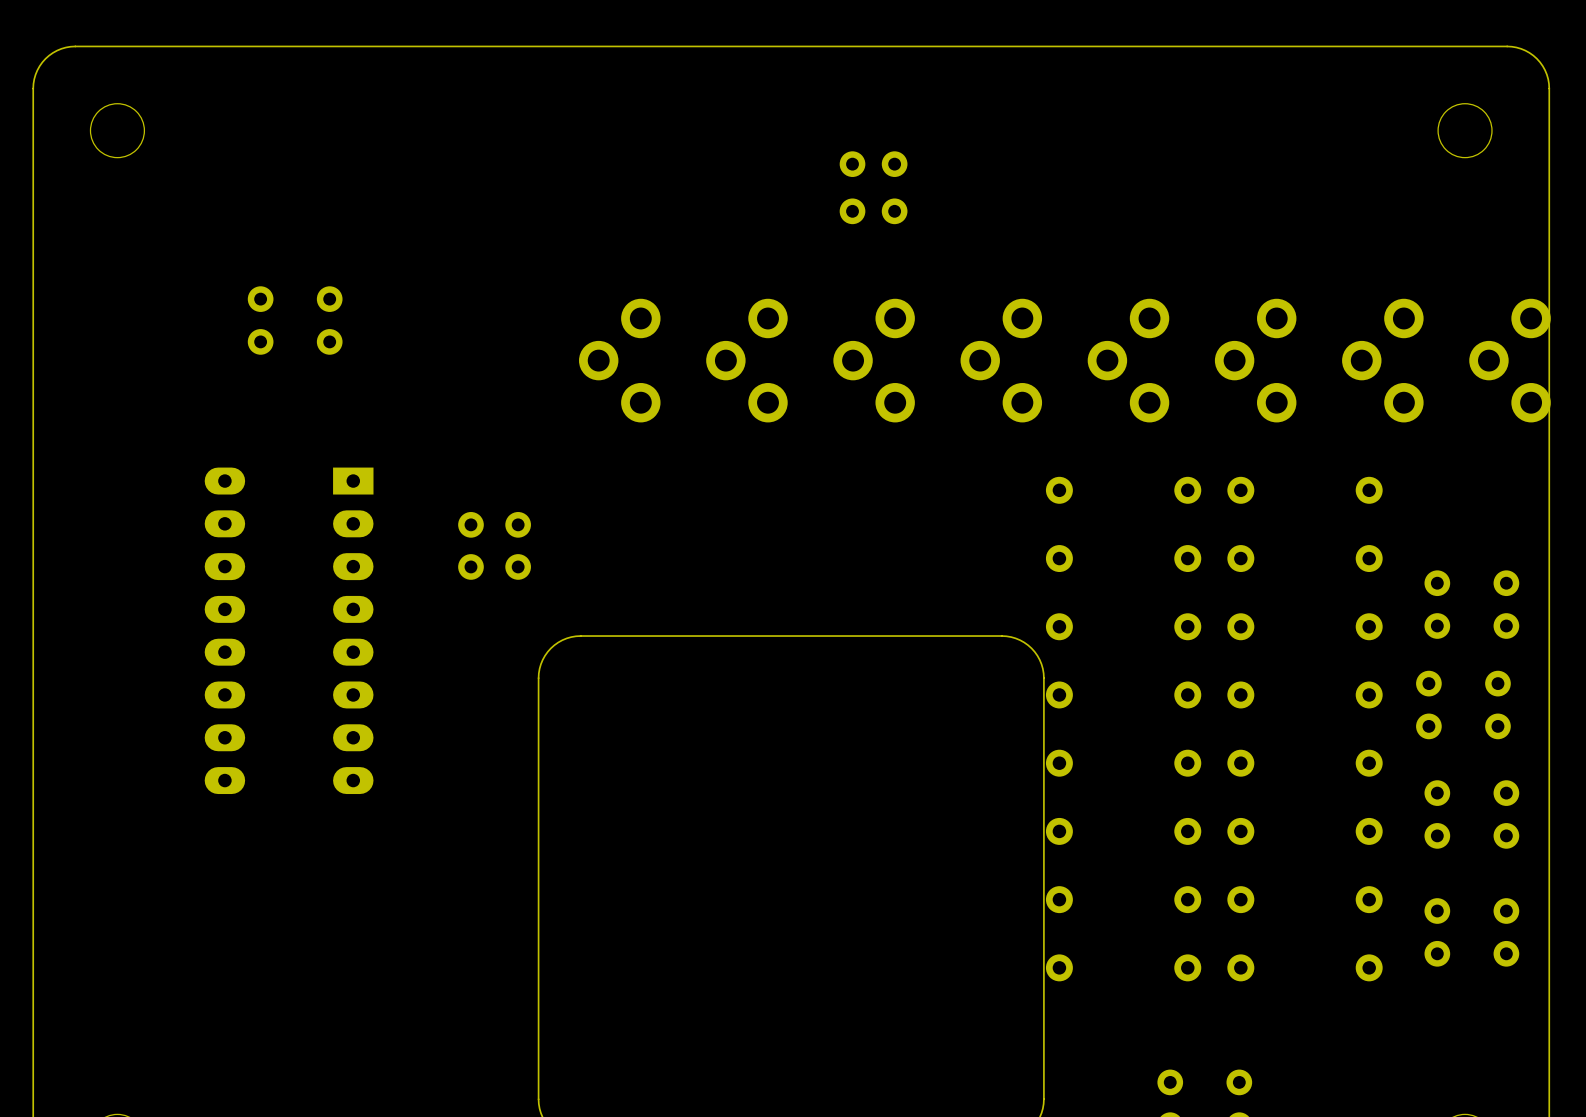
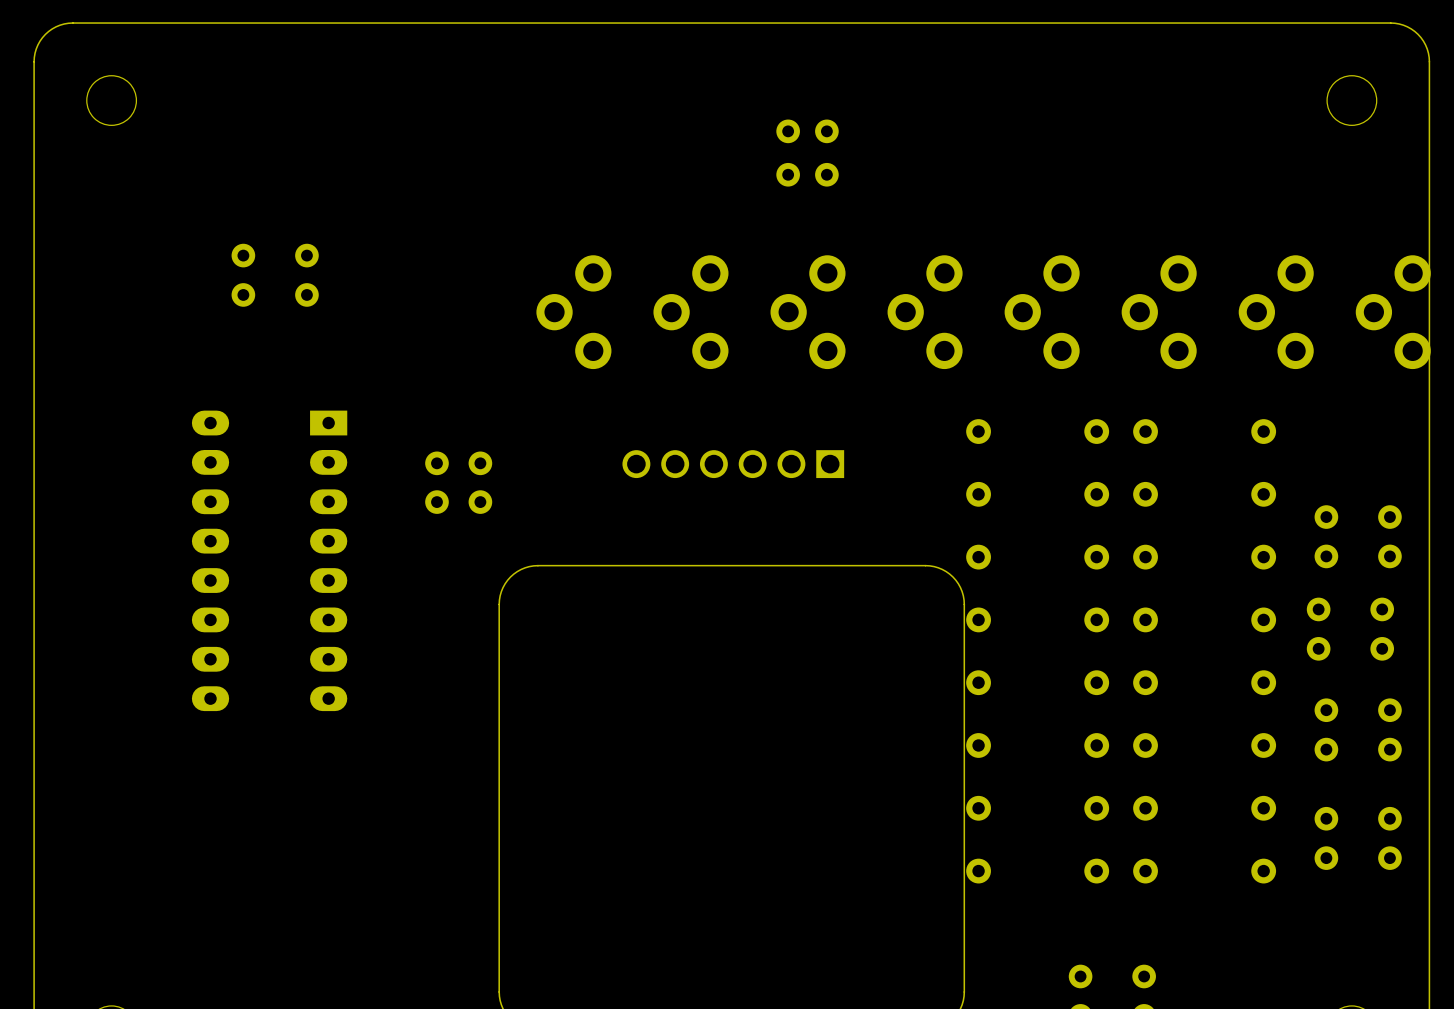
part: none -> (733, 464)

